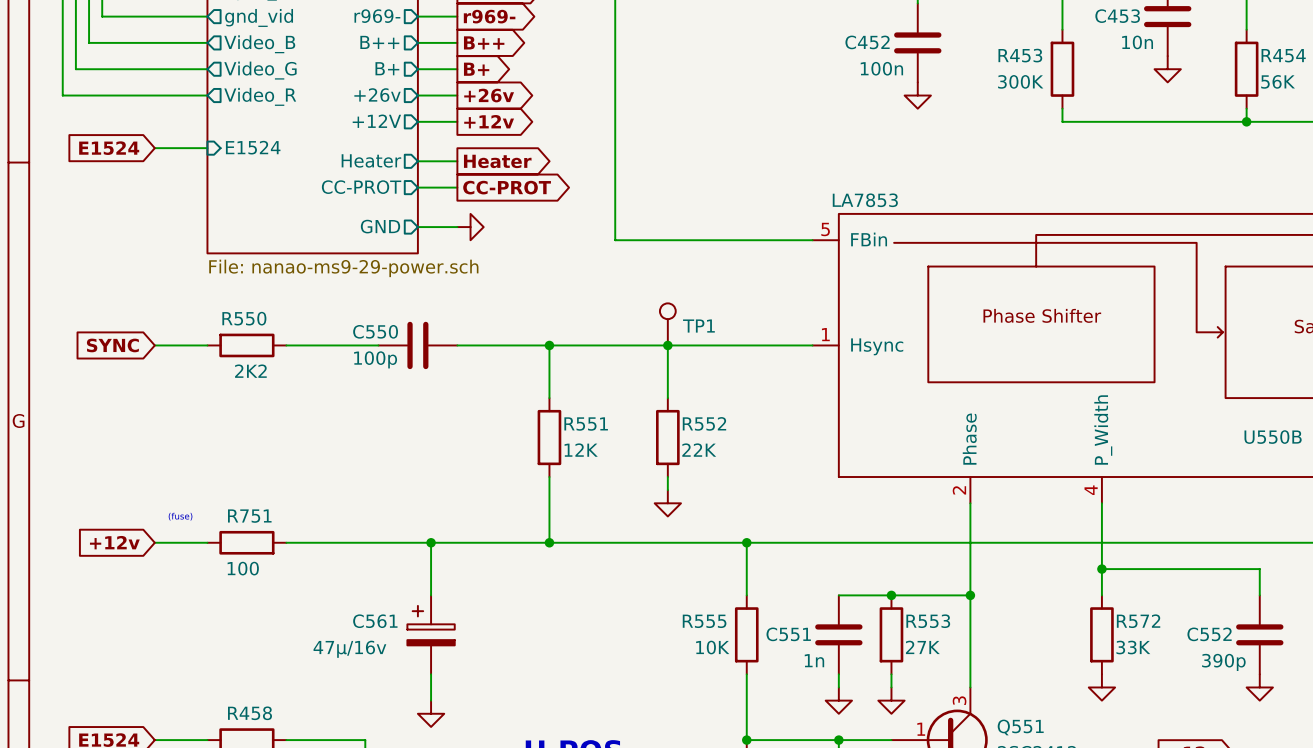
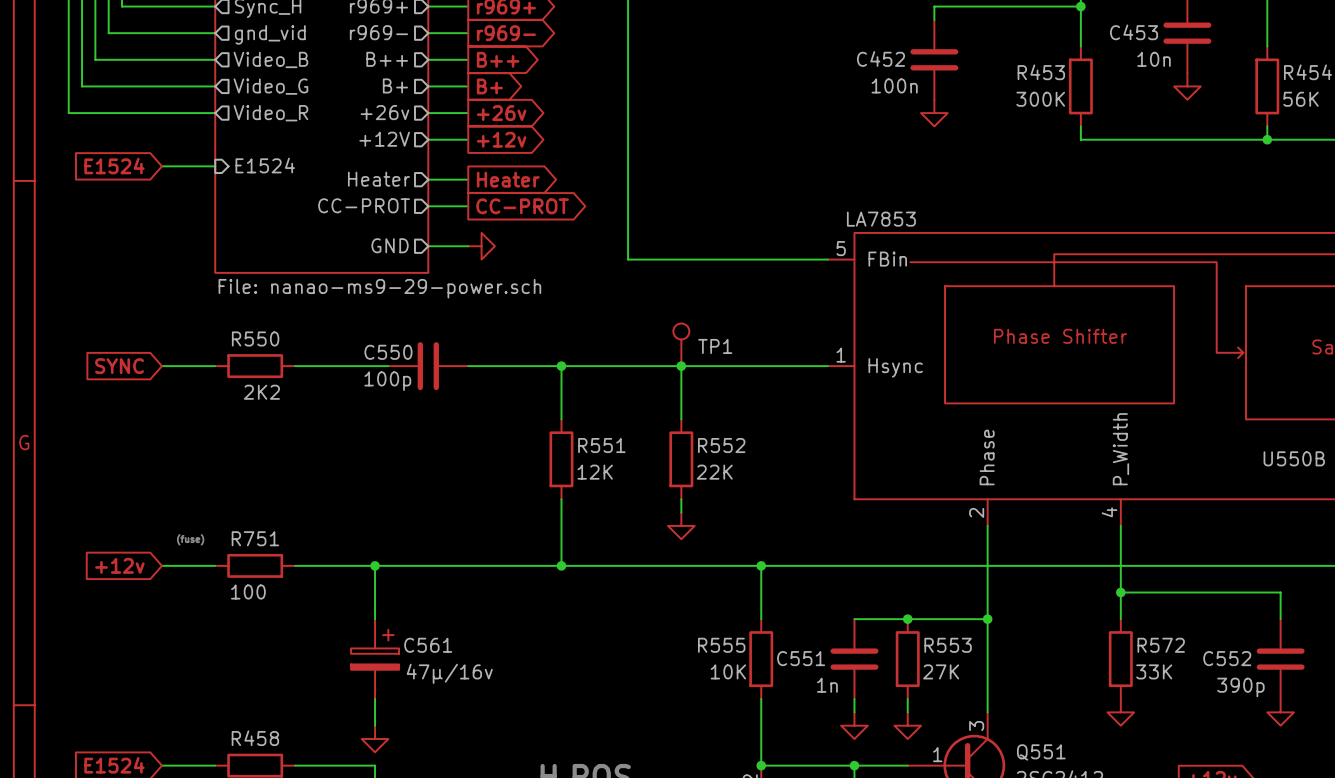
junction: none -> (375, 565)
wire: (431, 542) (431, 595) -> (375, 565) (375, 619)
junction: (431, 542) -> none
C561 flip: as is (431, 625) -> left-right (375, 649)
C561 position: (431, 634) -> (375, 659)
wire: (431, 674) (431, 700) -> (375, 699) (375, 725)
power symbol position: (431, 713) -> (375, 739)

